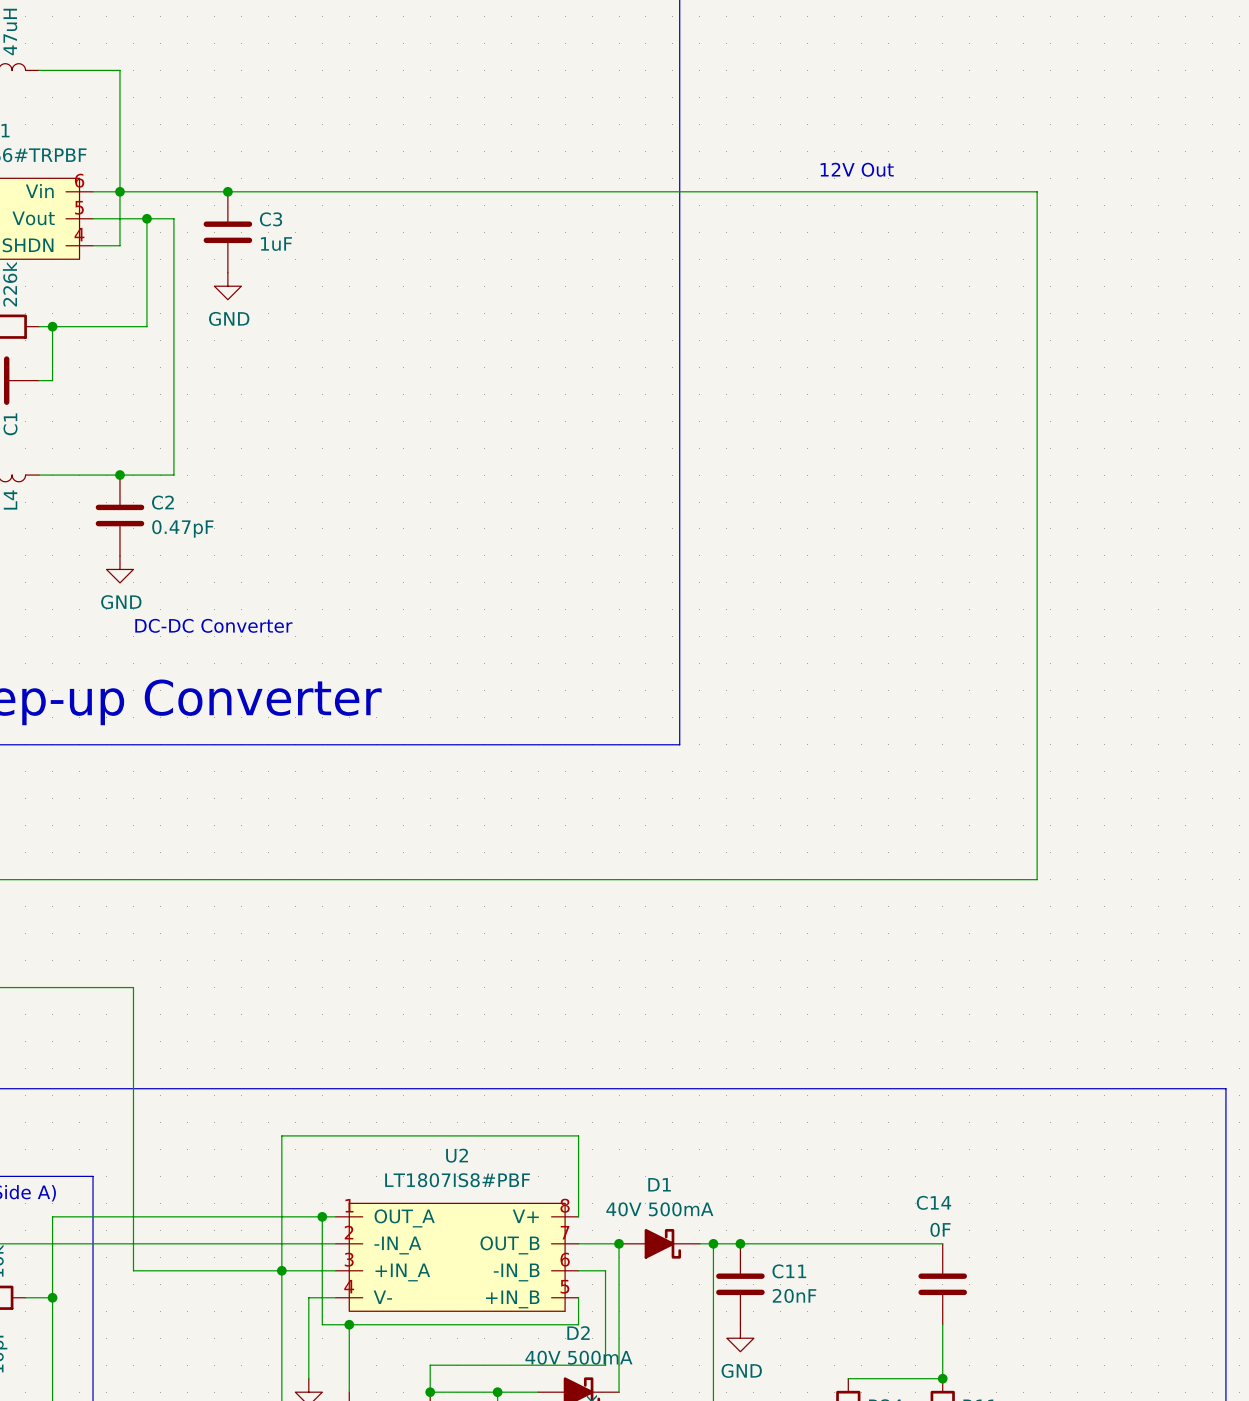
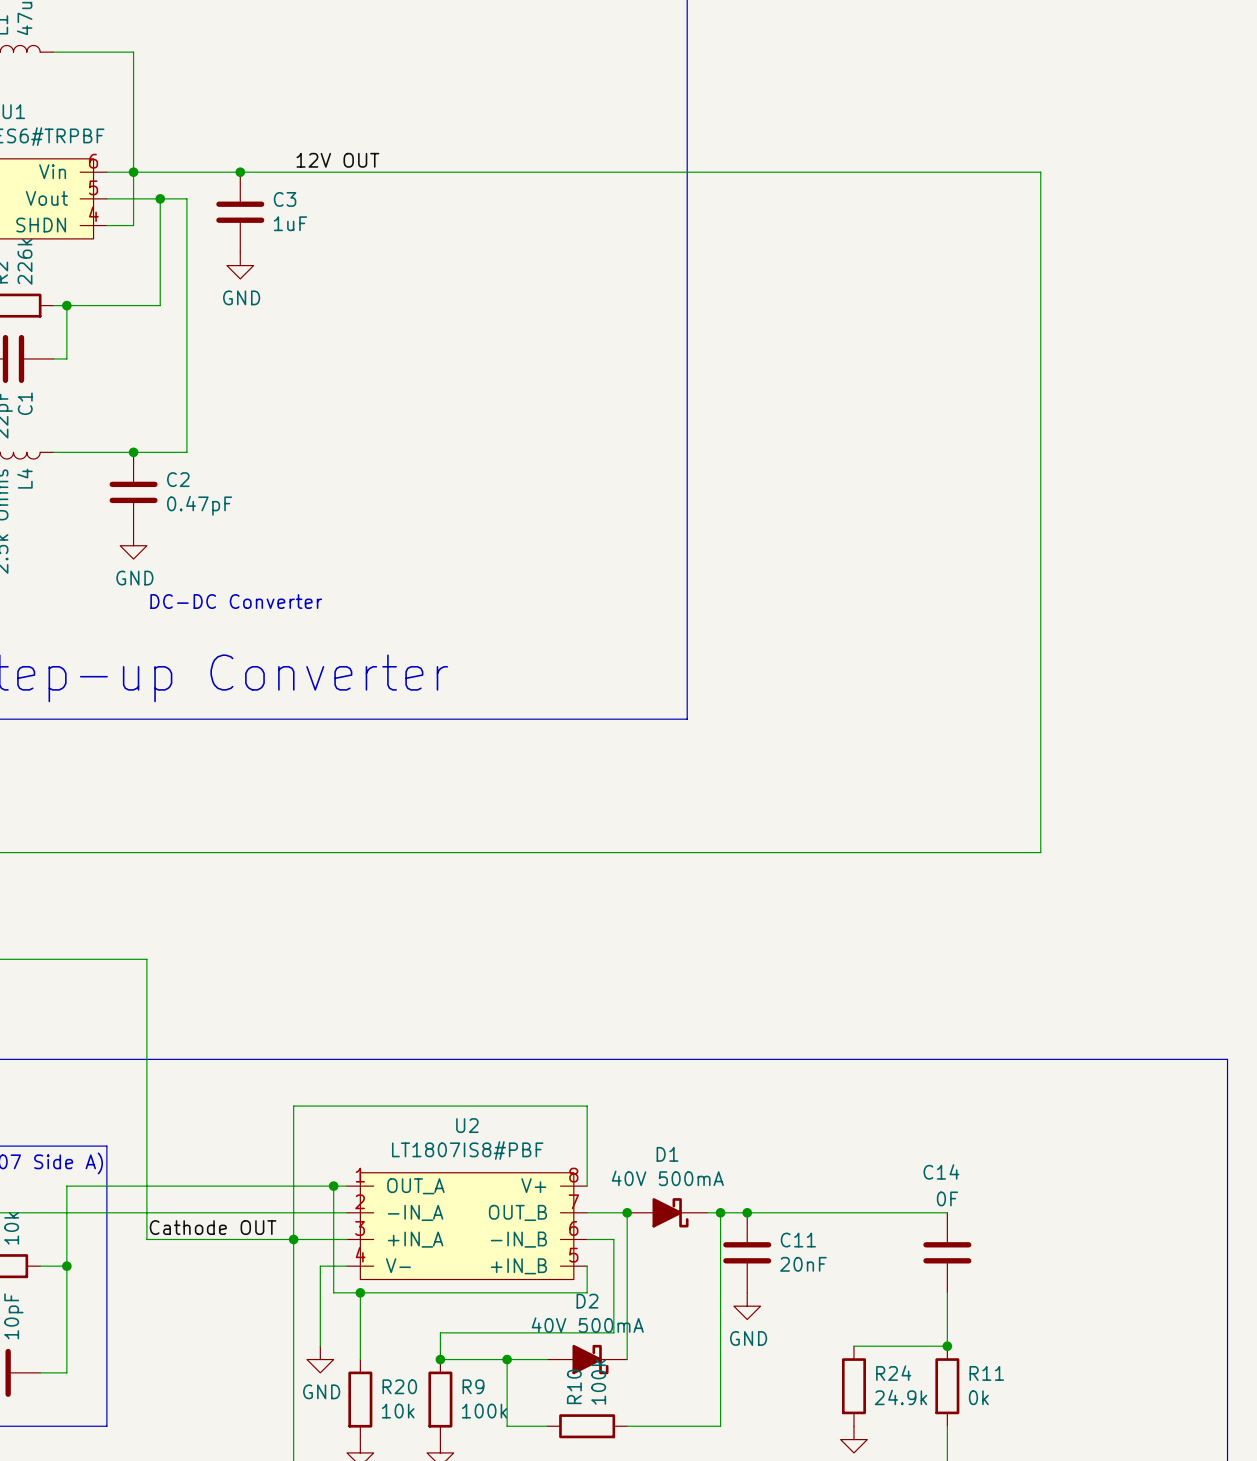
text: 12V Out (857, 169) -> none
label: none -> 12V OUT (337, 160)
label: none -> Cathode OUT (213, 1227)

